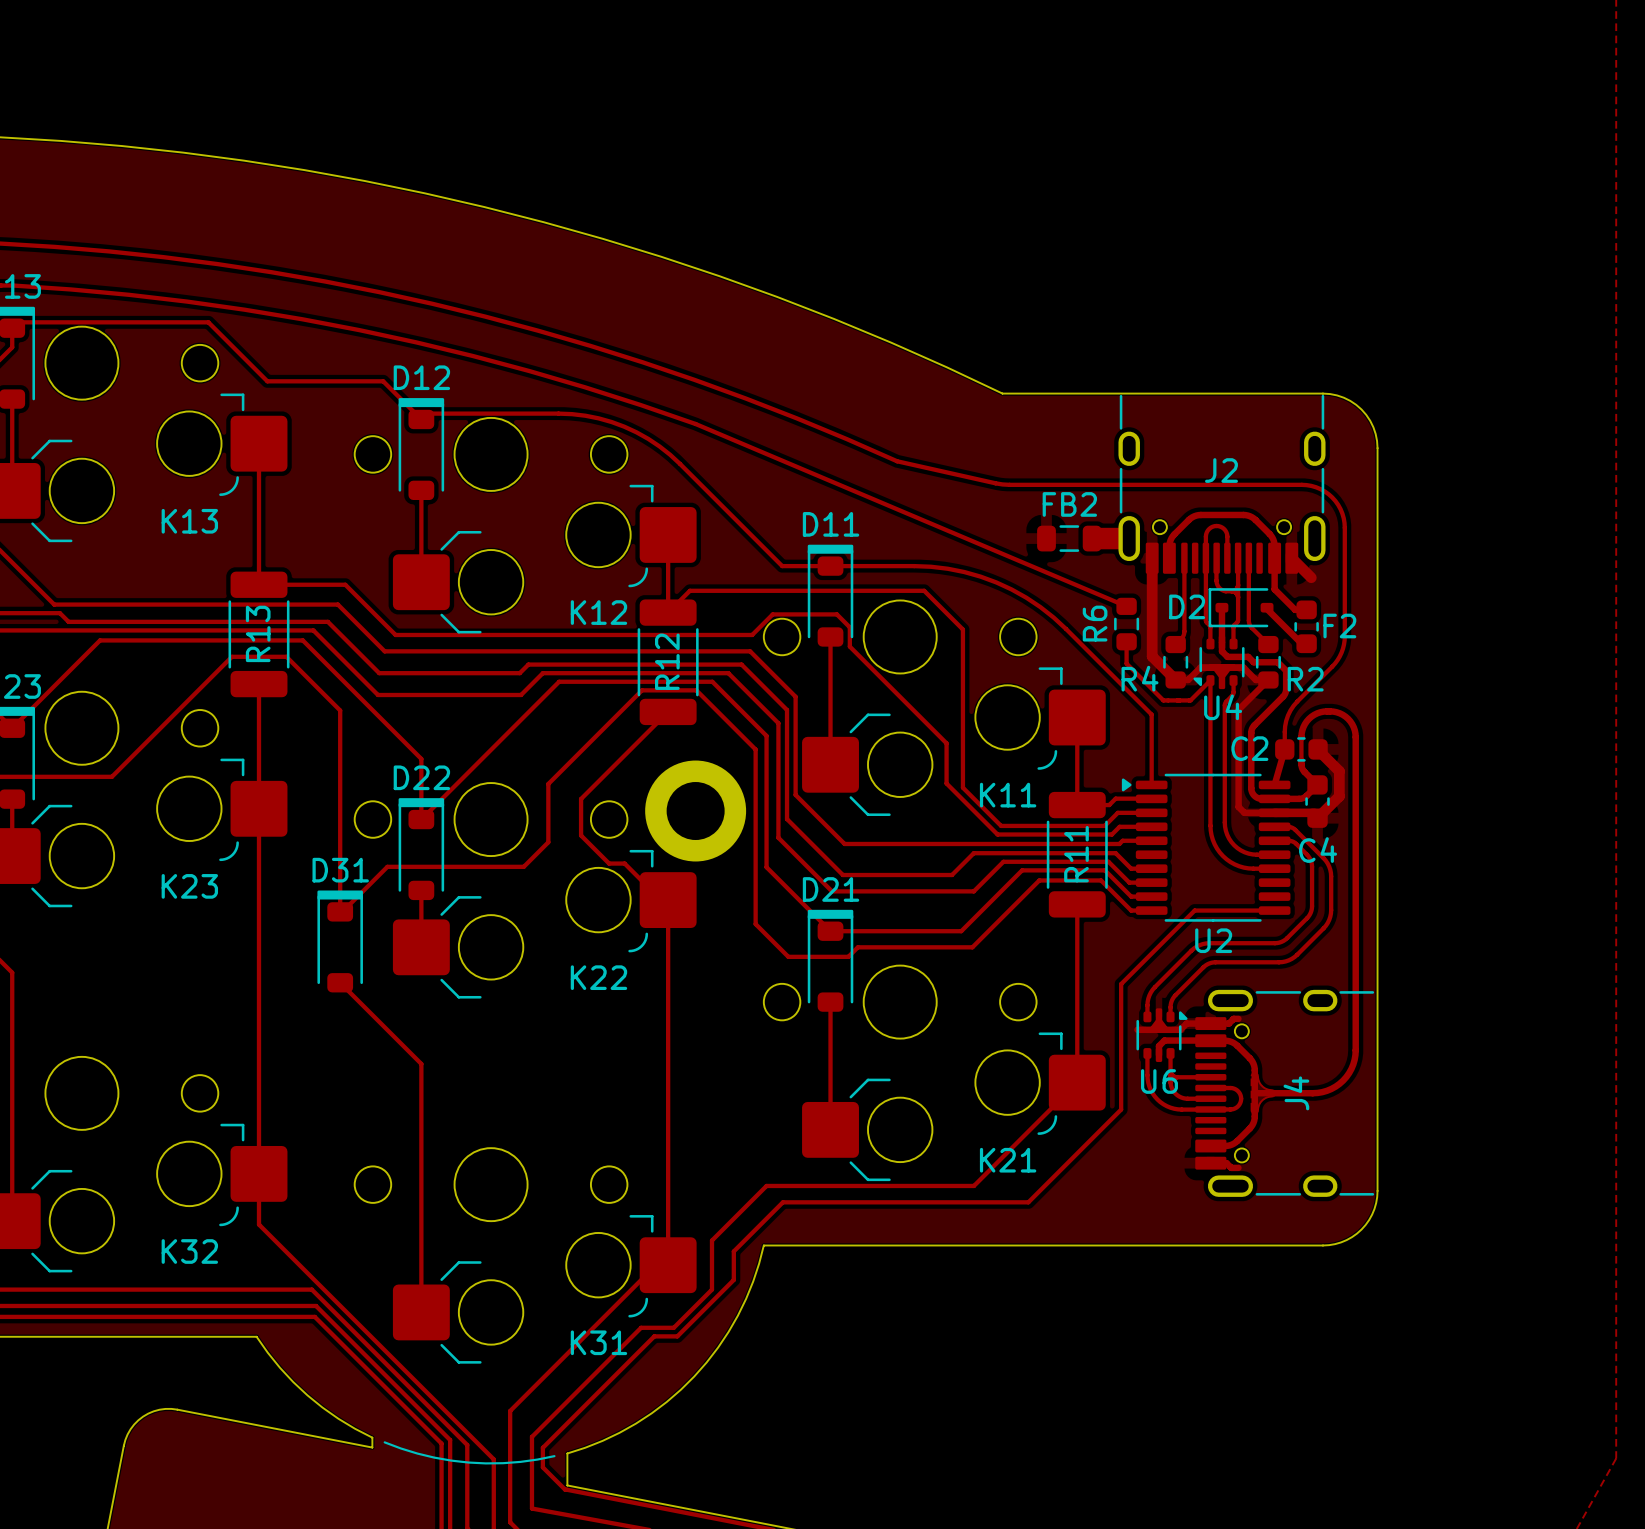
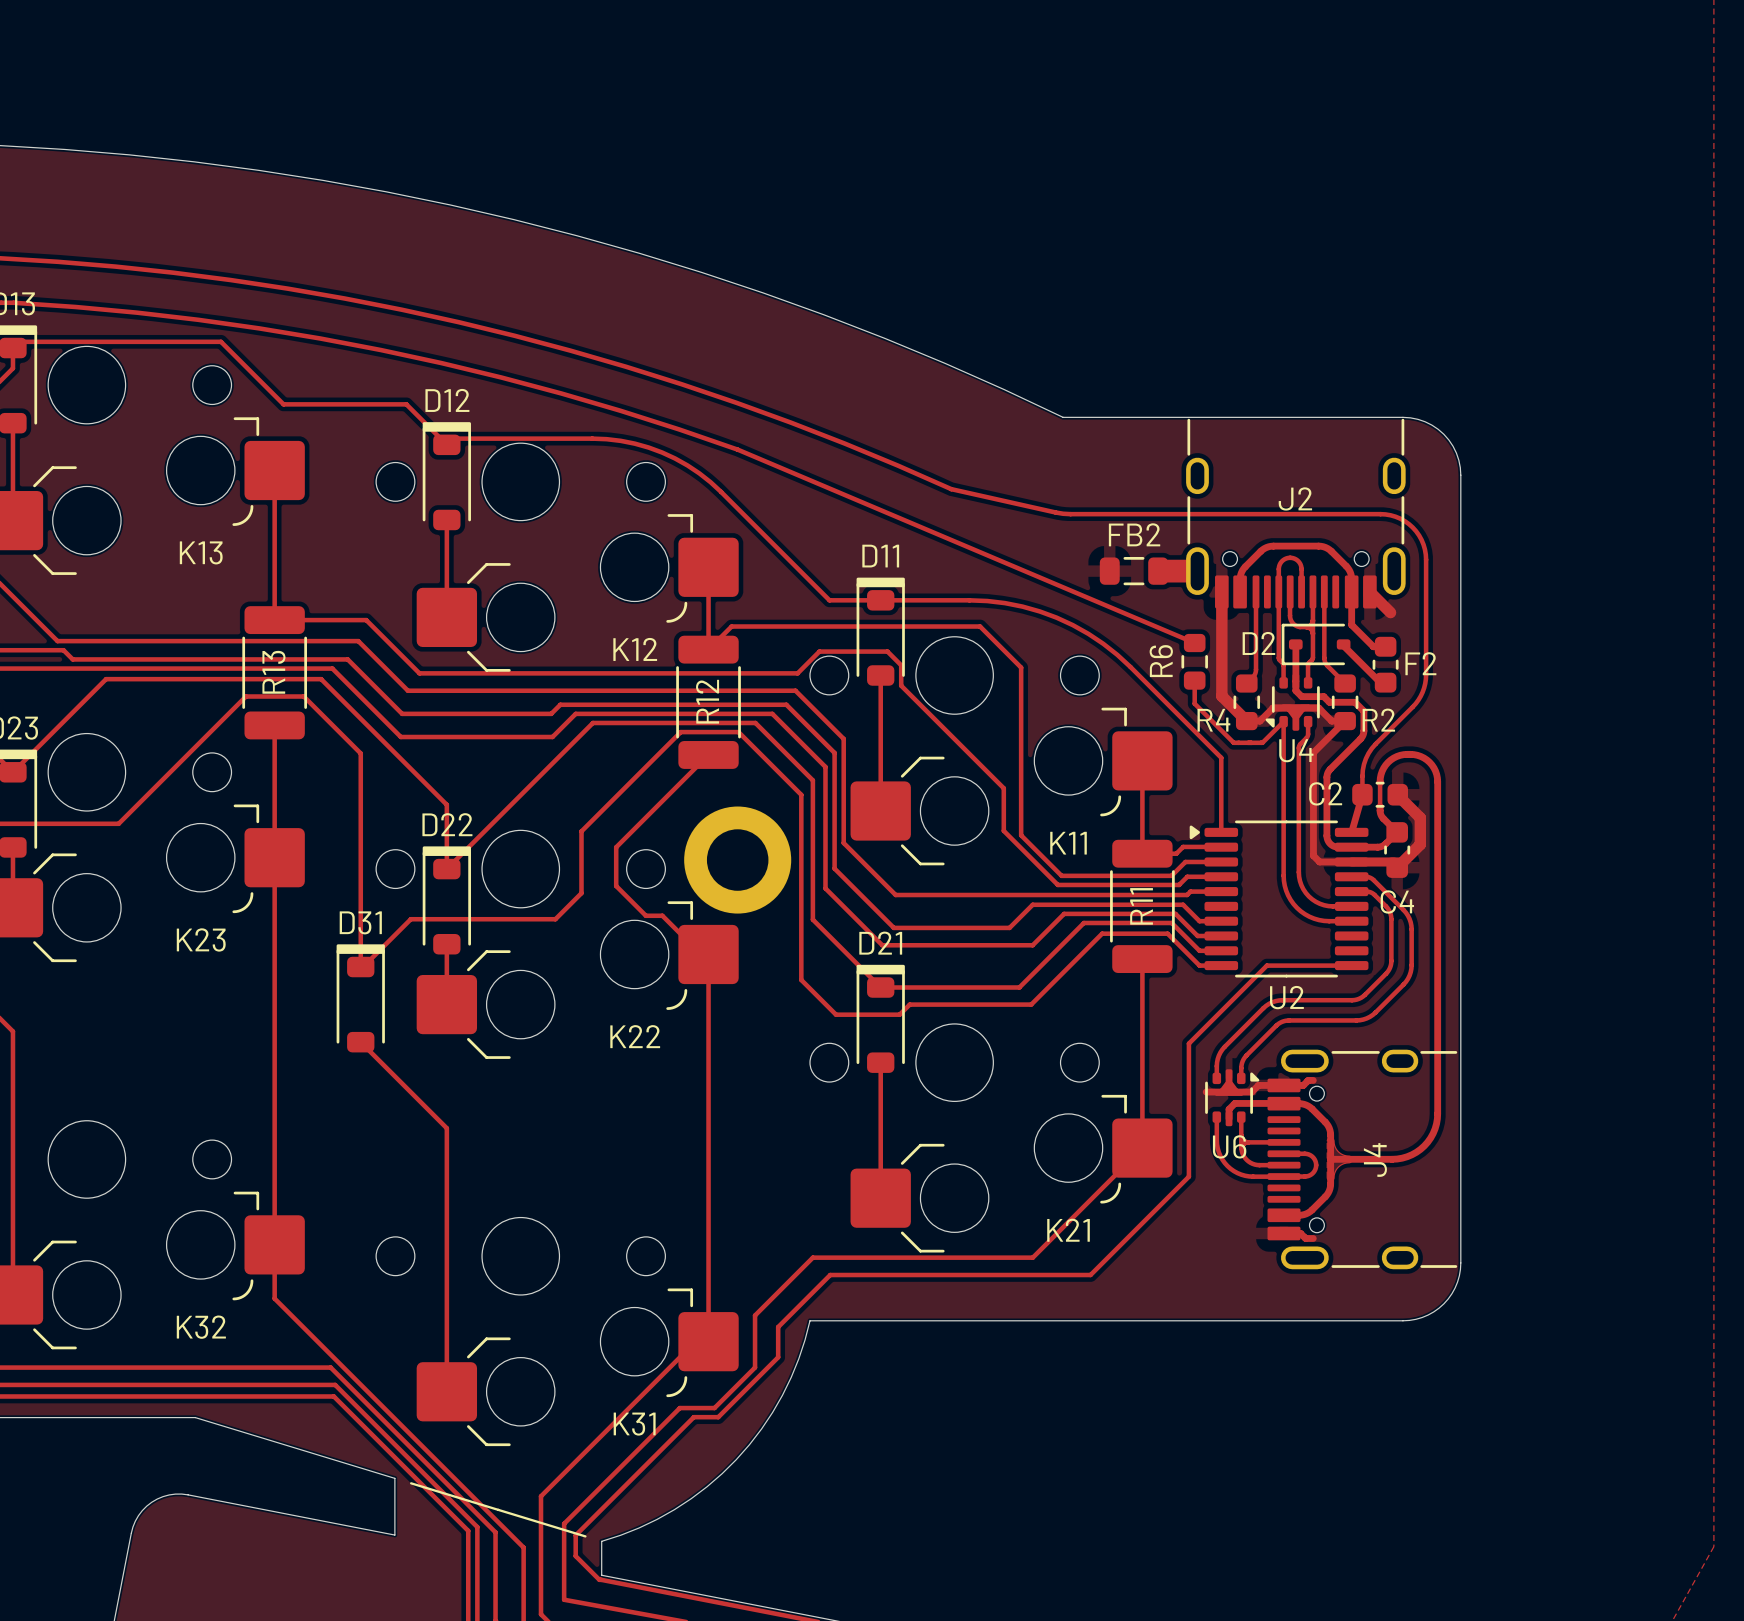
board edge: (184, 1336) (256, 1336) (280, 1367) (307, 1395) (338, 1418) (372, 1437) -> (195, 1417) (394, 1478) (394, 1524)
line: none -> (411, 1483) (585, 1536)
line: (384, 1442) (417, 1453) (468, 1462) (503, 1463) (554, 1456) -> none

